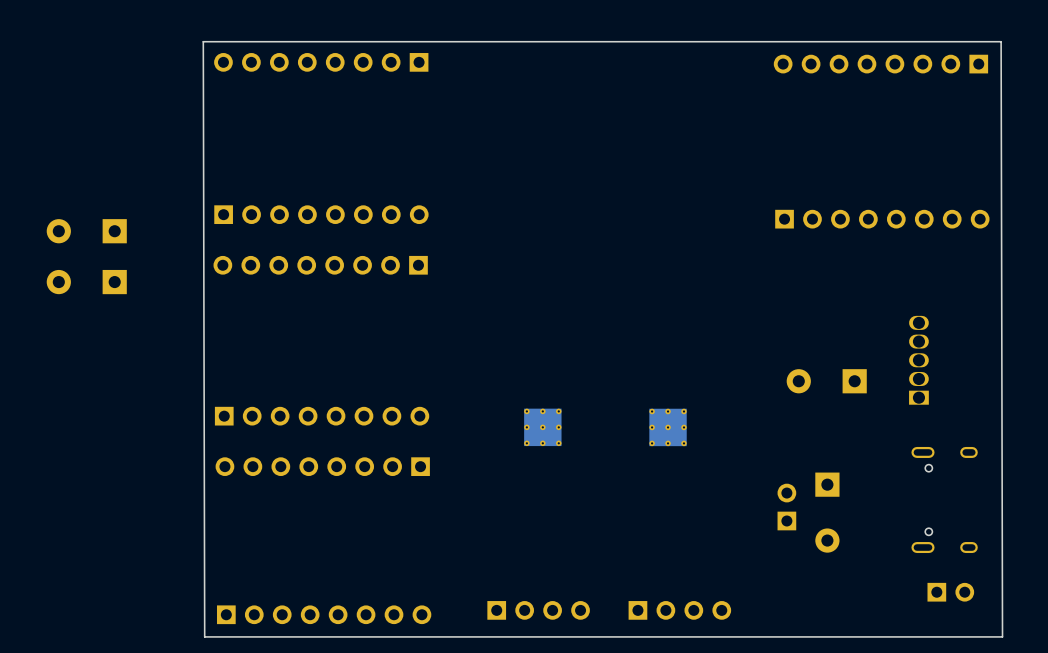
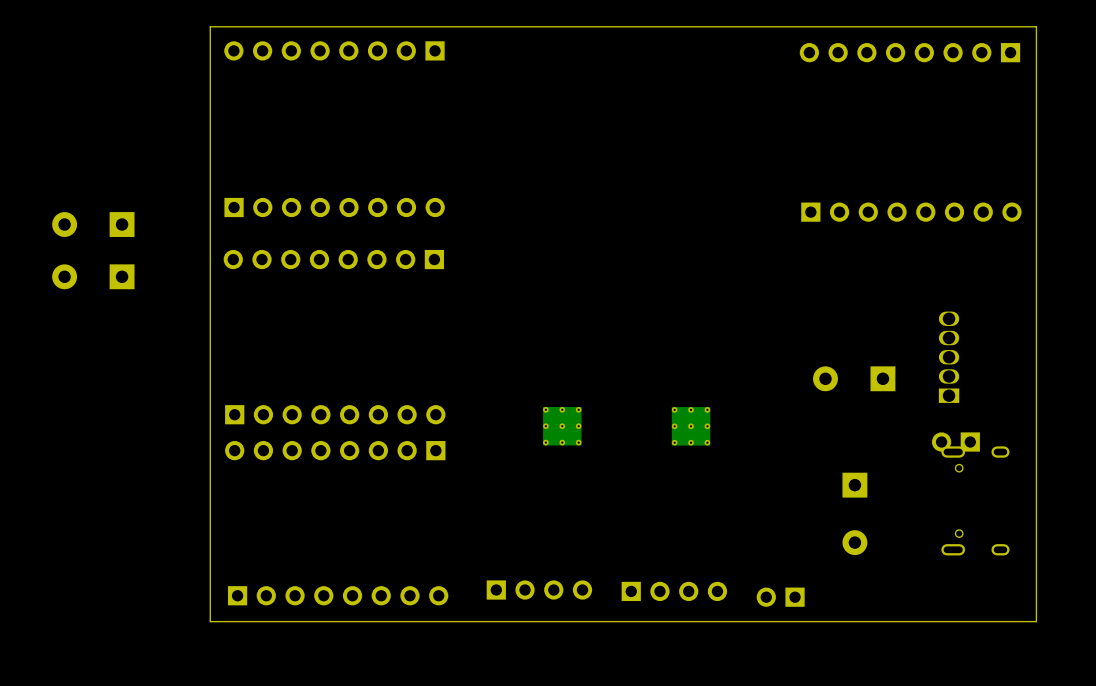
board edge: (1001, 41) (1002, 636) (204, 636) (203, 41) (1001, 41) -> (1036, 26) (1036, 621) (210, 621) (210, 26) (1036, 26)
part: none -> (955, 442)
part position: (322, 466) -> (335, 450)
part: (786, 507) -> none
part: (950, 592) -> none
part: none -> (780, 597)
part position: (538, 610) -> (539, 590)
part position: (679, 610) -> (674, 591)
part position: (324, 614) -> (338, 595)

